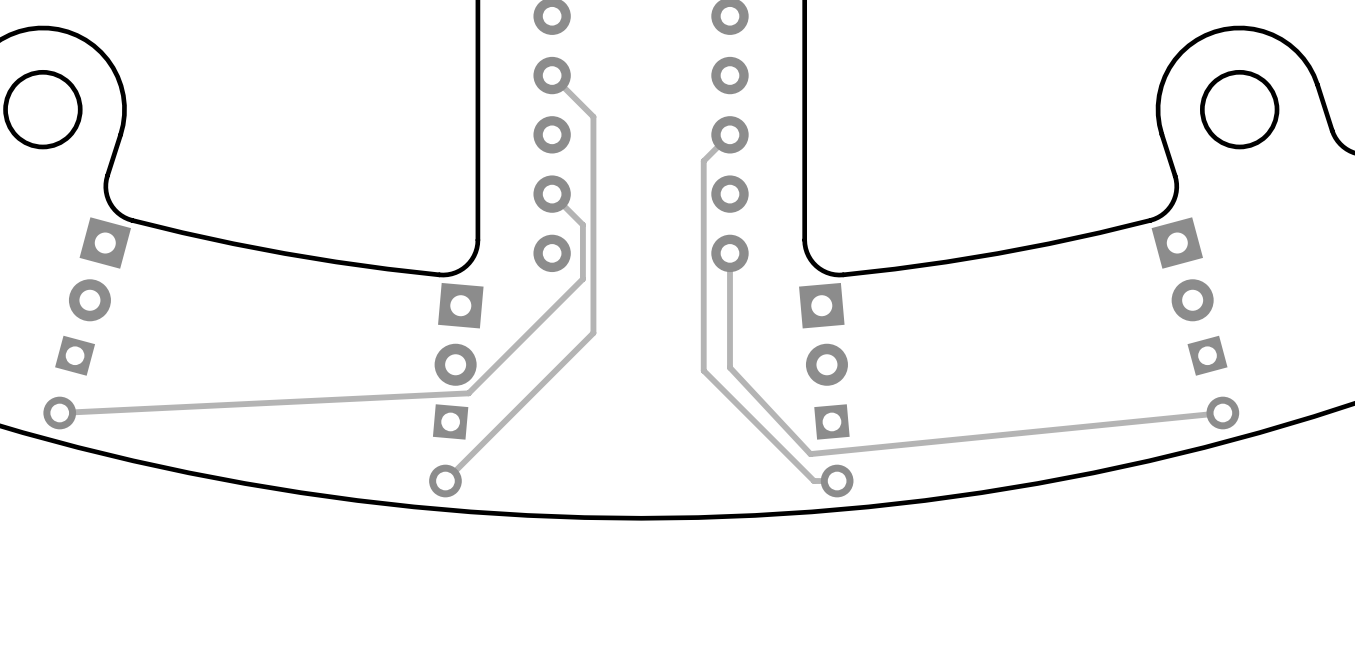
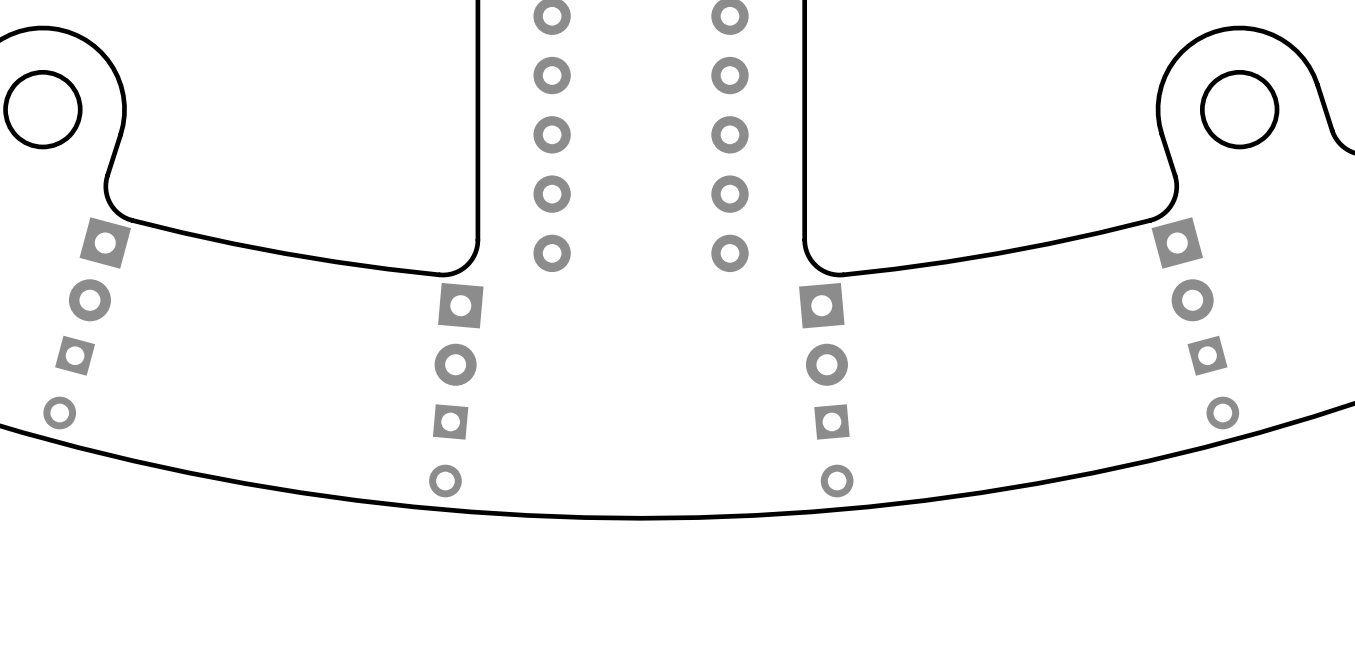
track: (552, 75) (593, 116) (593, 333) (445, 481) -> none
track: (729, 134) (703, 161) (703, 370) (814, 481) (837, 481) -> none
track: (552, 194) (582, 224) (582, 279) (468, 393) (59, 413) -> none
track: (729, 253) (729, 367) (810, 454) (1222, 413) -> none

